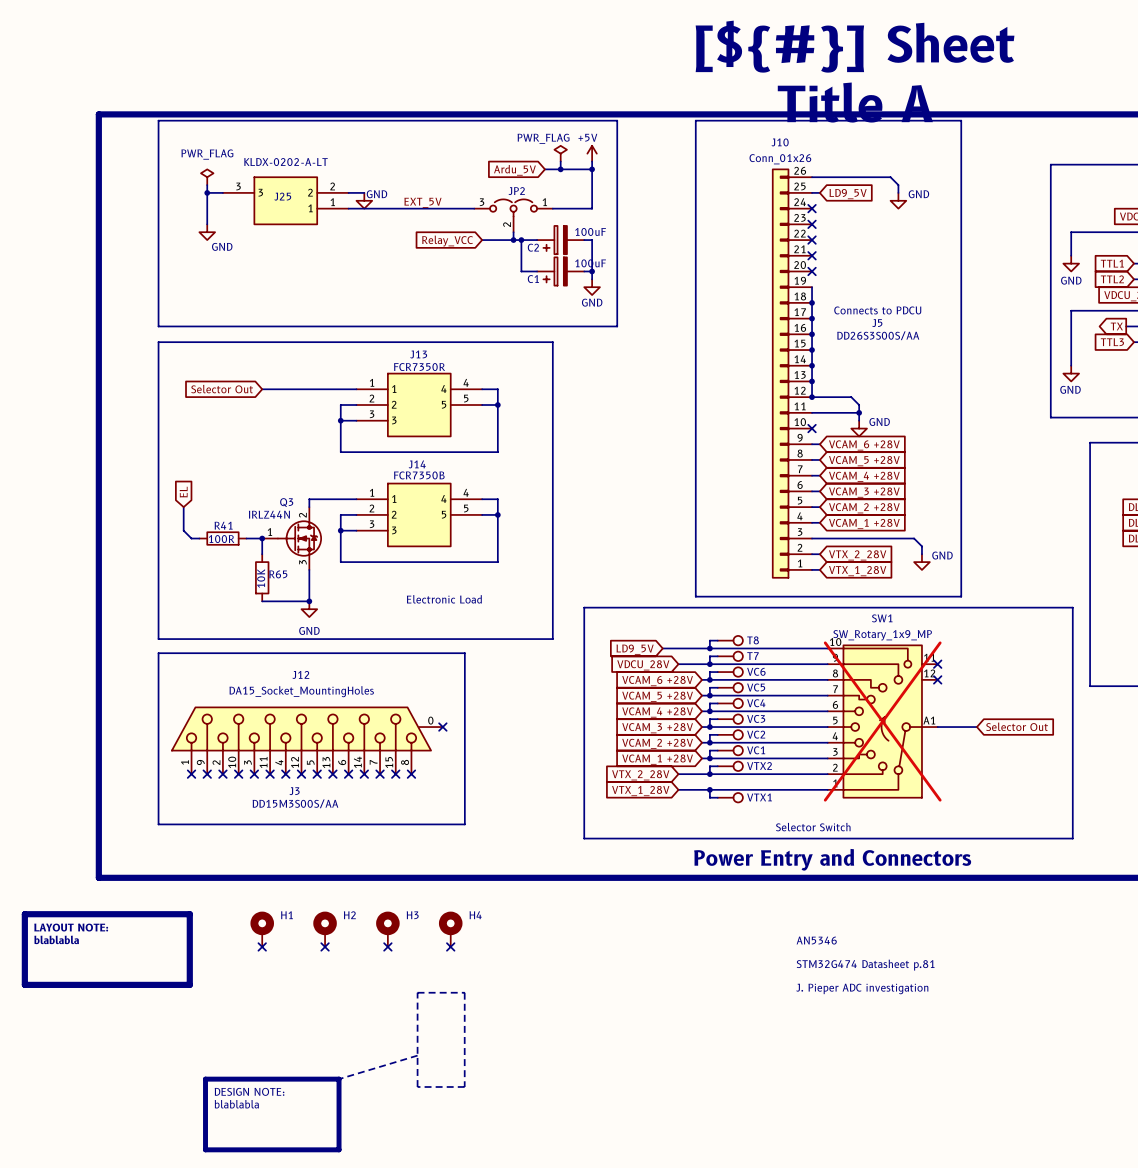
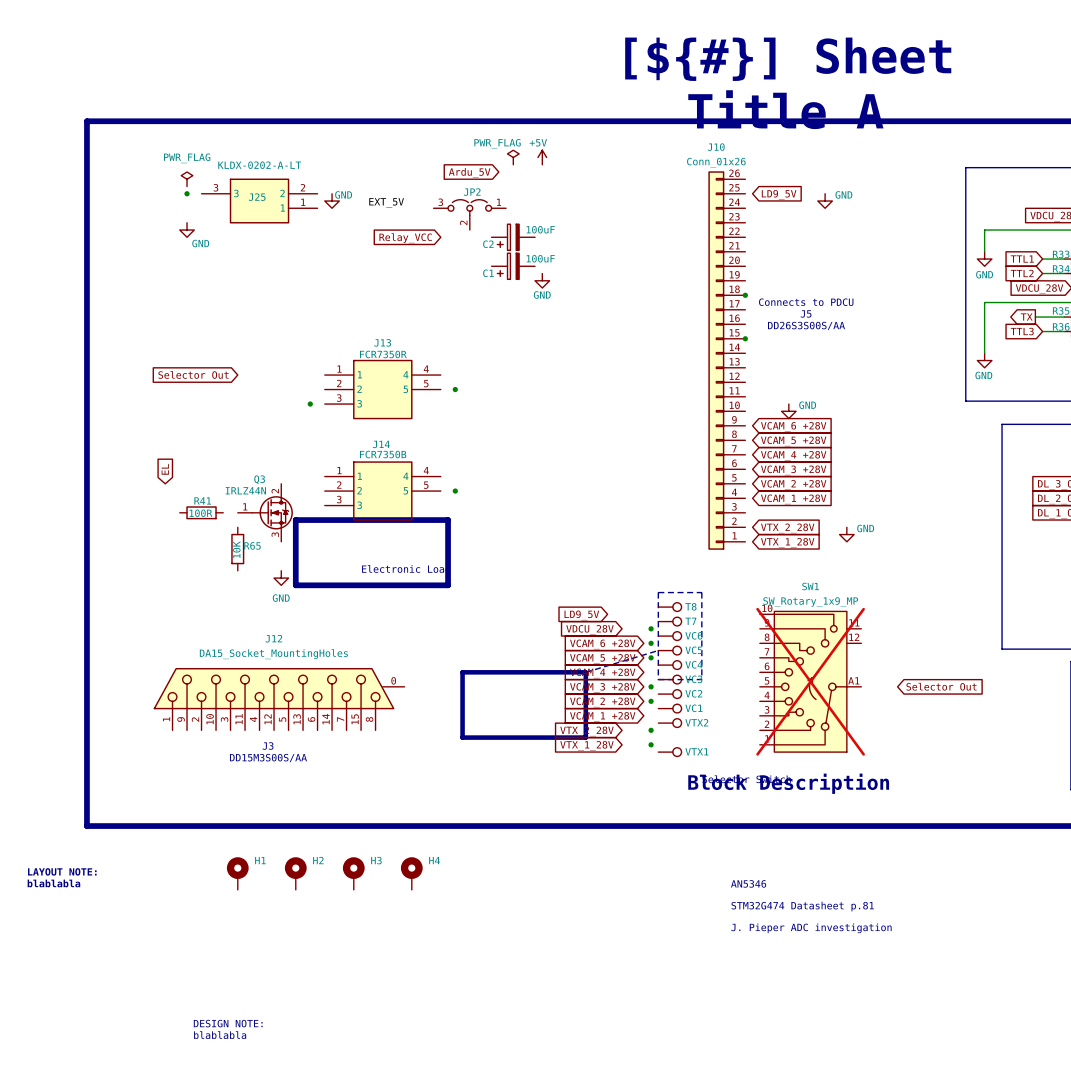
line: (158, 120) (158, 326) (617, 326) (617, 120) (158, 120) -> none
line: (695, 120) (961, 120) (961, 596) (695, 596) (695, 120) -> none
wire: (560, 161) (560, 169) -> none
wire: (592, 161) (592, 208) (552, 208) -> none
wire: (544, 169) (592, 169) -> none
junction: (560, 169) -> none
junction: (592, 169) -> none
wire: (812, 177) (890, 177) (898, 185) (898, 192) -> none
wire: (207, 185) (207, 224) -> none
wire: (207, 192) (222, 192) -> none
wire: (348, 192) (364, 192) -> none
wire: (812, 192) (819, 192) -> none
wire: (348, 208) (474, 208) -> none
no-connect mark: (812, 208) -> none
no-connect mark: (812, 224) -> none
wire: (513, 232) (513, 240) -> none
wire: (482, 240) (537, 240) -> none
junction: (513, 240) -> none
wire: (521, 240) (521, 271) (537, 271) -> none
junction: (521, 240) -> none
wire: (584, 240) (592, 240) (592, 279) -> none
no-connect mark: (812, 240) -> none
no-connect mark: (812, 255) -> none
wire: (584, 271) (592, 271) -> none
junction: (592, 271) -> none
no-connect mark: (812, 271) -> none
wire: (812, 287) (812, 397) (851, 397) (859, 405) (859, 420) -> none
junction: (812, 318) -> none
junction: (812, 334) -> none
line: (158, 342) (552, 342) (552, 639) (158, 639) (158, 342) -> none
junction: (812, 365) -> none
junction: (812, 381) -> none
wire: (262, 389) (356, 389) -> none
wire: (482, 389) (497, 389) (497, 452) (340, 452) (340, 405) (356, 405) -> none
junction: (812, 397) -> none
wire: (482, 405) (497, 405) -> none
wire: (812, 412) (859, 412) -> none
junction: (859, 412) -> none
wire: (340, 420) (356, 420) -> none
no-connect mark: (812, 428) -> none
wire: (812, 444) (819, 444) -> none
wire: (812, 459) (819, 459) -> none
wire: (812, 475) (819, 475) -> none
wire: (812, 491) (819, 491) -> none
wire: (356, 499) (309, 499) (309, 507) -> none
wire: (482, 499) (497, 499) (497, 562) (340, 562) (340, 514) (356, 514) -> none
wire: (183, 507) (183, 530) (191, 538) (199, 538) -> none
wire: (812, 507) (819, 507) -> none
wire: (482, 514) (497, 514) -> none
wire: (812, 522) (819, 522) -> none
wire: (340, 530) (356, 530) -> none
junction: (340, 530) -> none
wire: (246, 538) (262, 538) (262, 554) -> none
junction: (262, 538) -> none
wire: (812, 538) (914, 538) (921, 546) (921, 554) -> none
line: none -> (295, 520) (448, 520) (448, 585) (295, 585) (295, 520)
wire: (812, 554) (819, 554) -> none
wire: (309, 569) (309, 601) (262, 601) -> none
wire: (812, 569) (819, 569) -> none
junction: (309, 601) -> none
line: (584, 607) (1072, 607) (1072, 838) (584, 838) (584, 607) -> none
line: none -> (658, 592) (701, 592) (701, 679) (658, 679) (658, 592)
wire: (717, 640) (709, 640) (709, 648) -> none
wire: (662, 648) (827, 648) -> none
junction: (709, 648) -> none
line: (158, 653) (158, 824) (464, 824) (464, 653) (158, 653) -> none
wire: (717, 656) (709, 656) (709, 664) -> none
wire: (678, 664) (827, 664) -> none
no-connect mark: (937, 664) -> none
wire: (717, 672) (709, 672) (709, 679) -> none
wire: (702, 679) (827, 679) -> none
no-connect mark: (937, 679) -> none
line: none -> (658, 650) (585, 672)
wire: (717, 687) (709, 687) (709, 695) -> none
wire: (702, 695) (827, 695) -> none
wire: (717, 703) (709, 703) (709, 711) -> none
line: none -> (585, 672) (462, 672) (462, 737) (585, 737) (585, 672)
wire: (702, 711) (827, 711) -> none
junction: (709, 711) -> none
wire: (717, 719) (709, 719) (709, 727) -> none
no-connect mark: (442, 727) -> none
wire: (702, 727) (827, 727) -> none
wire: (937, 727) (976, 727) -> none
wire: (717, 734) (709, 734) (709, 742) -> none
wire: (702, 742) (827, 742) -> none
wire: (717, 750) (709, 750) (709, 758) -> none
wire: (702, 758) (827, 758) -> none
junction: (709, 758) -> none
wire: (717, 766) (709, 766) (709, 774) -> none
no-connect mark: (191, 774) -> none
no-connect mark: (207, 774) -> none
no-connect mark: (222, 774) -> none
no-connect mark: (238, 774) -> none
no-connect mark: (254, 774) -> none
no-connect mark: (270, 774) -> none
no-connect mark: (285, 774) -> none
no-connect mark: (301, 774) -> none
no-connect mark: (317, 774) -> none
no-connect mark: (332, 774) -> none
no-connect mark: (348, 774) -> none
no-connect mark: (364, 774) -> none
no-connect mark: (380, 774) -> none
no-connect mark: (395, 774) -> none
no-connect mark: (411, 774) -> none
wire: (678, 774) (827, 774) -> none
wire: (678, 789) (827, 789) -> none
wire: (709, 789) (709, 797) (717, 797) -> none
text: none -> Block Description (788, 783)
text: Power Entry and Connectors (832, 859) -> none
line: (24, 914) (189, 914) (189, 984) (24, 984) (24, 914) -> none
no-connect mark: (262, 946) -> none
no-connect mark: (325, 946) -> none
no-connect mark: (387, 946) -> none
no-connect mark: (450, 946) -> none
line: (417, 992) (464, 992) (464, 1086) (417, 1086) (417, 992) -> none
line: (417, 1055) (339, 1079) -> none
line: (339, 1079) (205, 1079) (205, 1149) (339, 1149) (339, 1079) -> none

